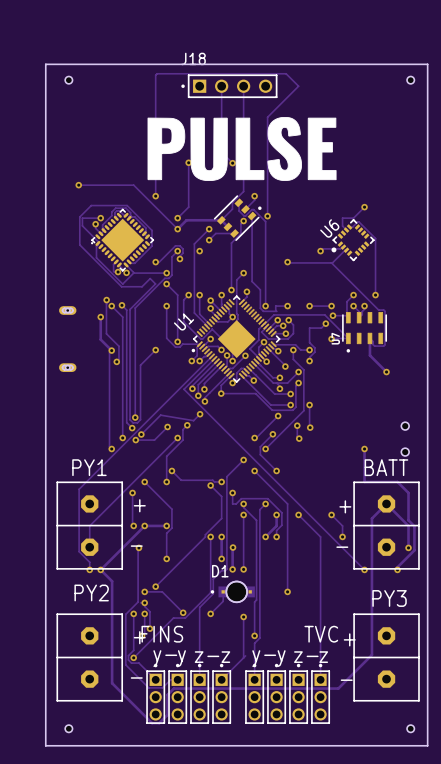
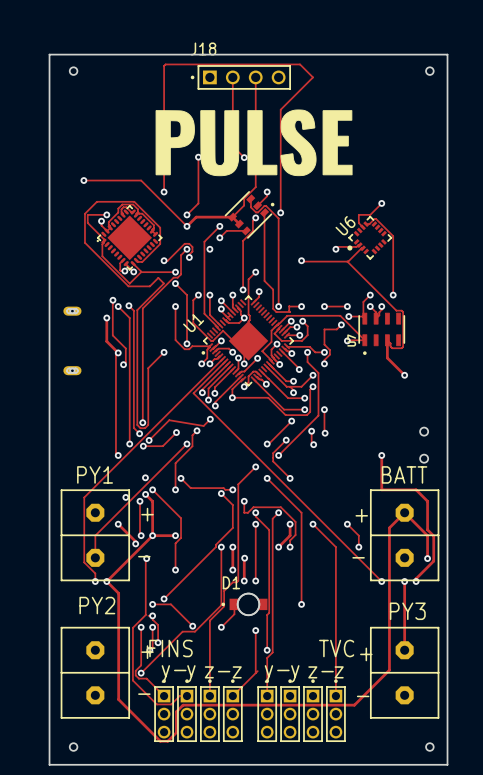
via: none -> (145, 477)
track: none -> (145, 494) (152, 501) (152, 535)
via: none -> (145, 494)
via: none -> (125, 497)
track: none -> (118, 524) (135, 543)
via: none -> (118, 524)
via: none -> (135, 543)
track: none -> (404, 581) (404, 650)
via: none -> (404, 581)

